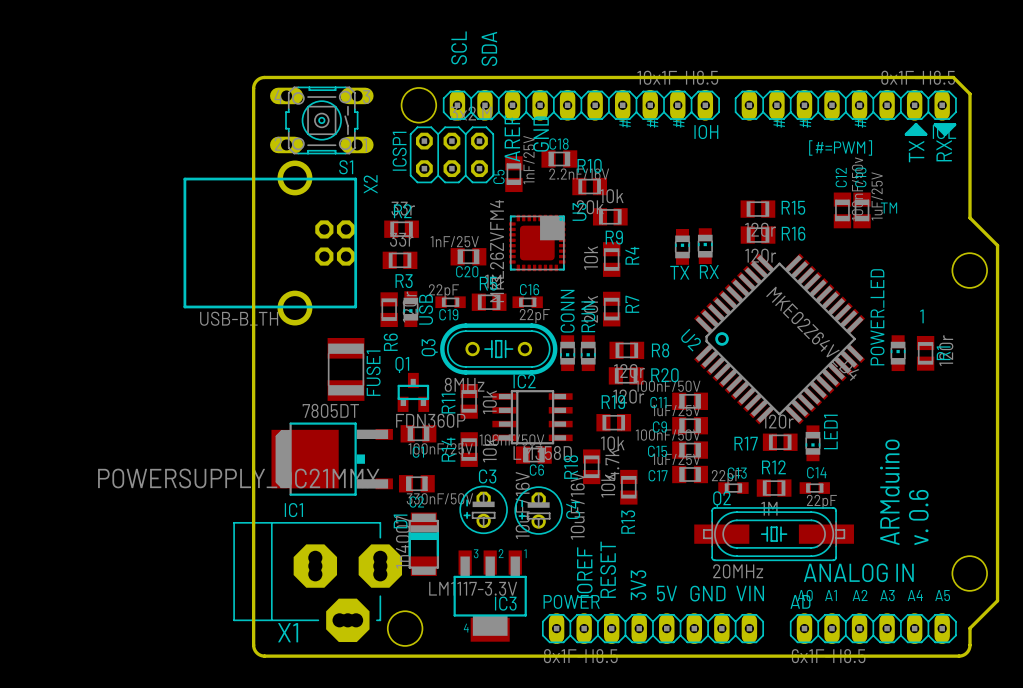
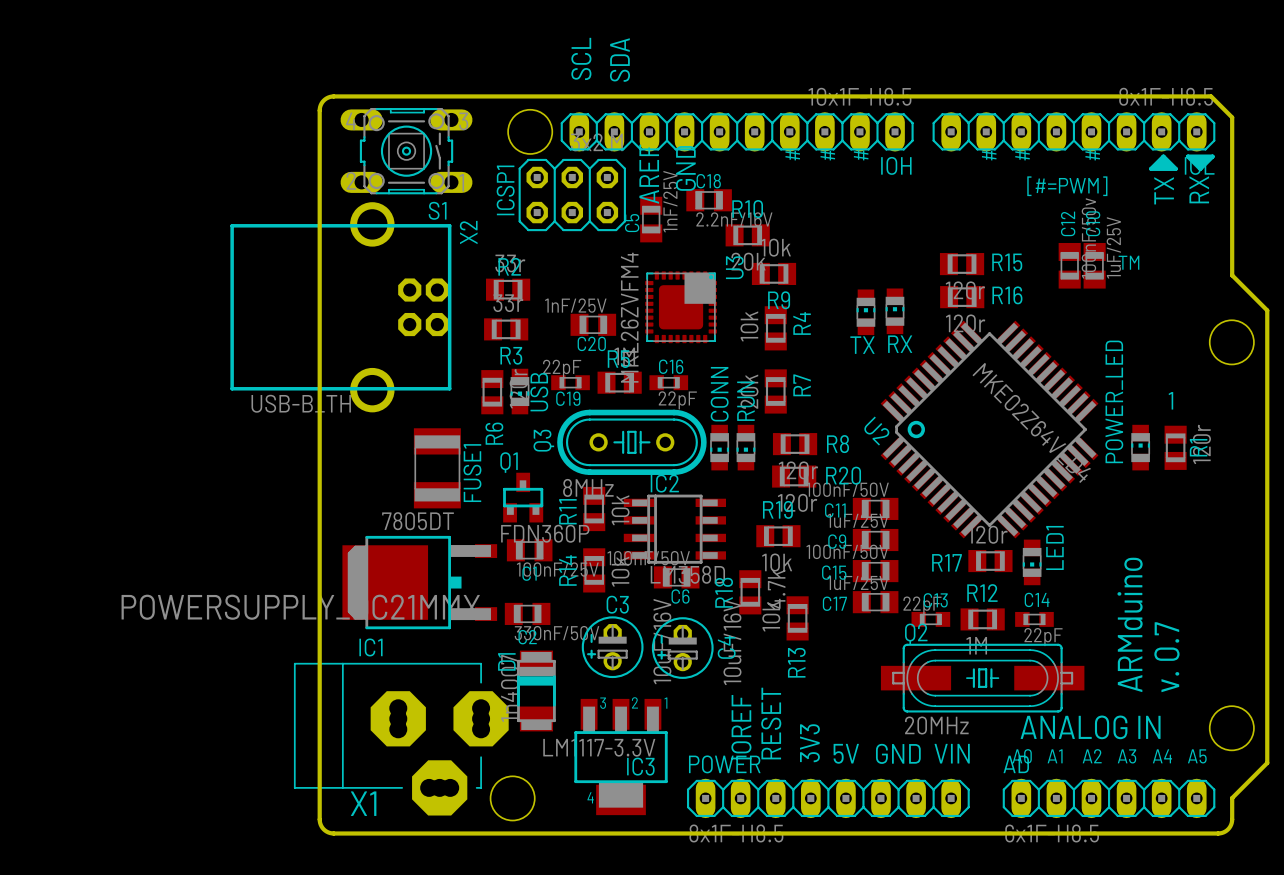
text: v. 0.6 (918, 517) -> v. 0.7 (1166, 657)

